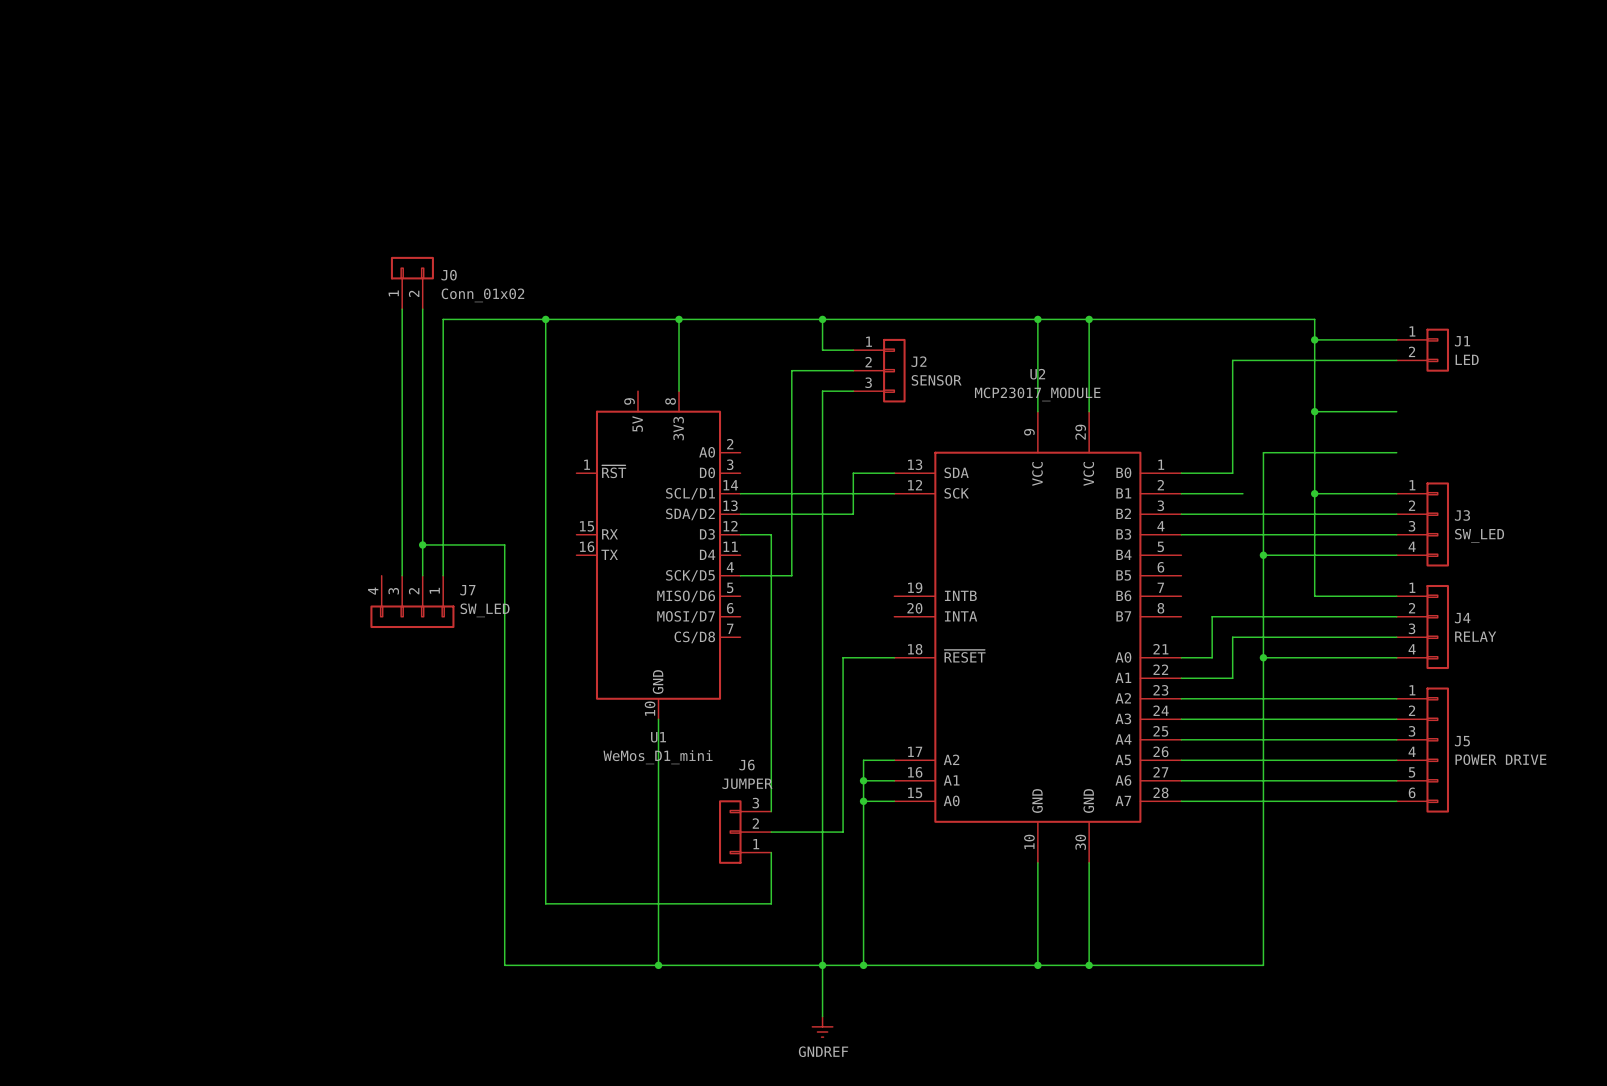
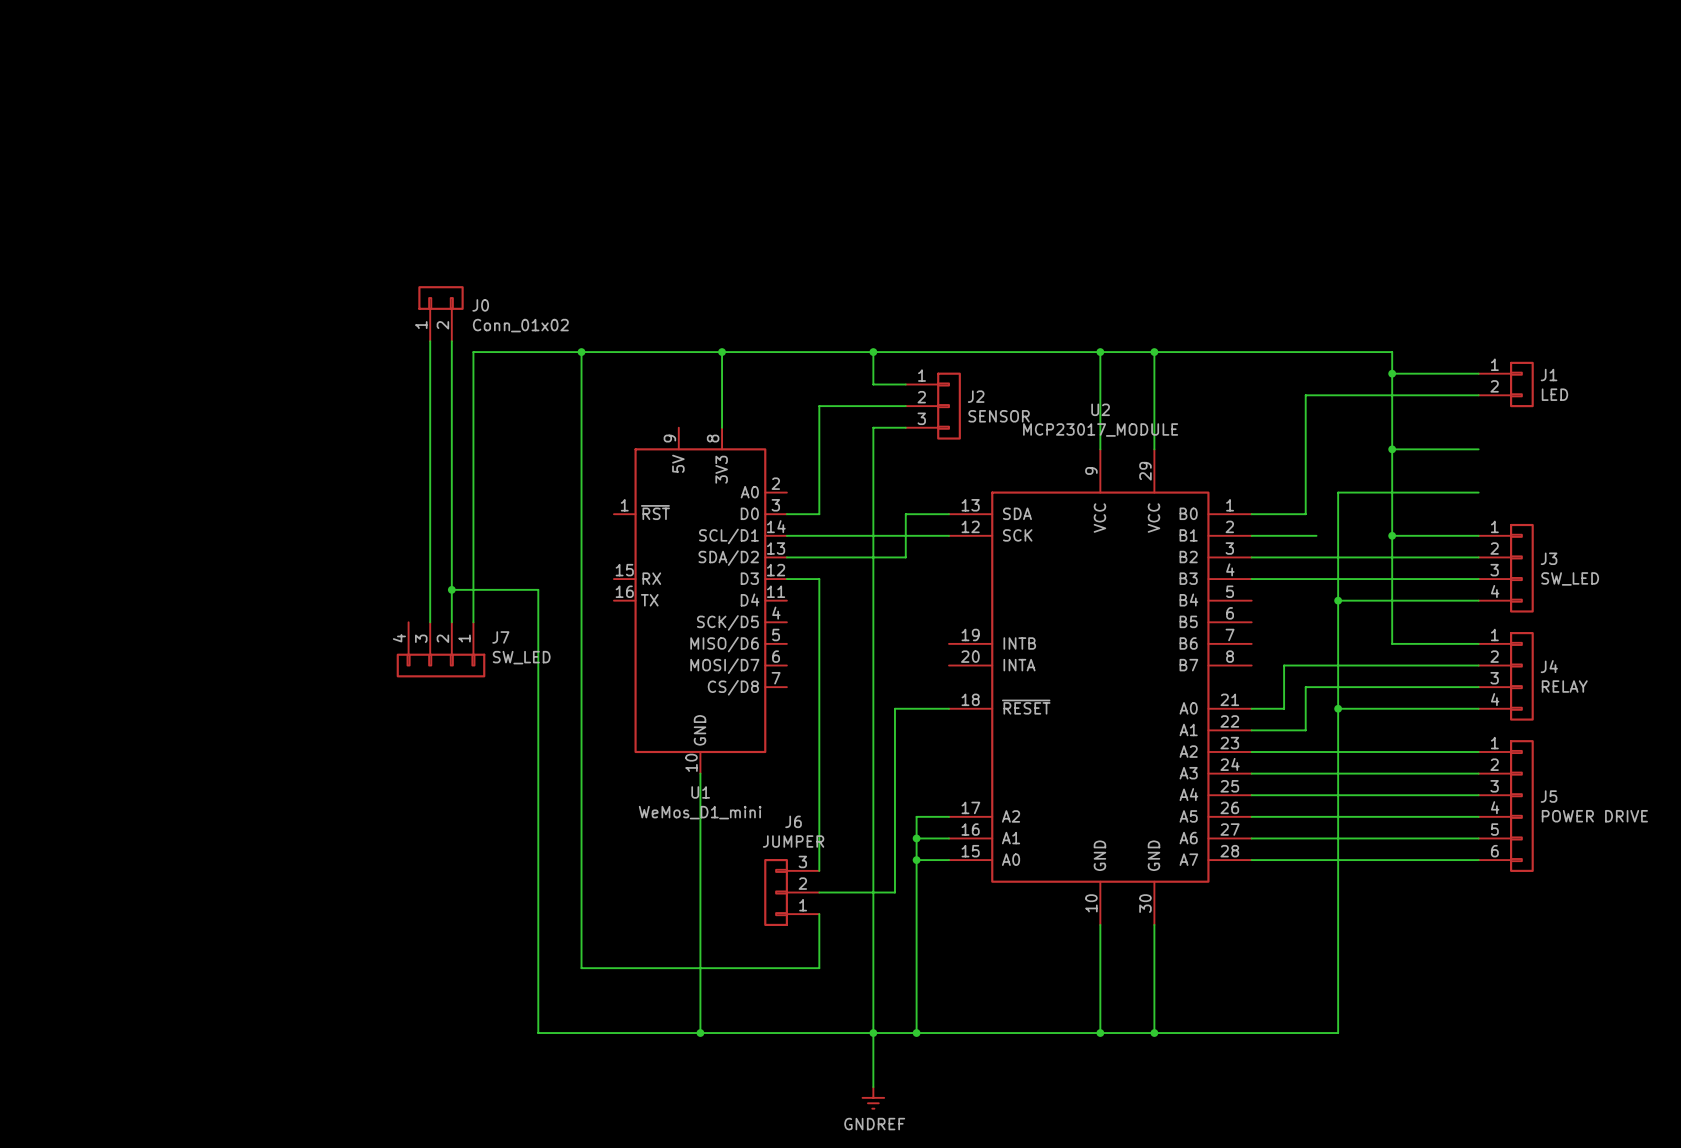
wire: (791, 370) (791, 575) (740, 575) -> (840, 406) (819, 406) (819, 514) (786, 514)

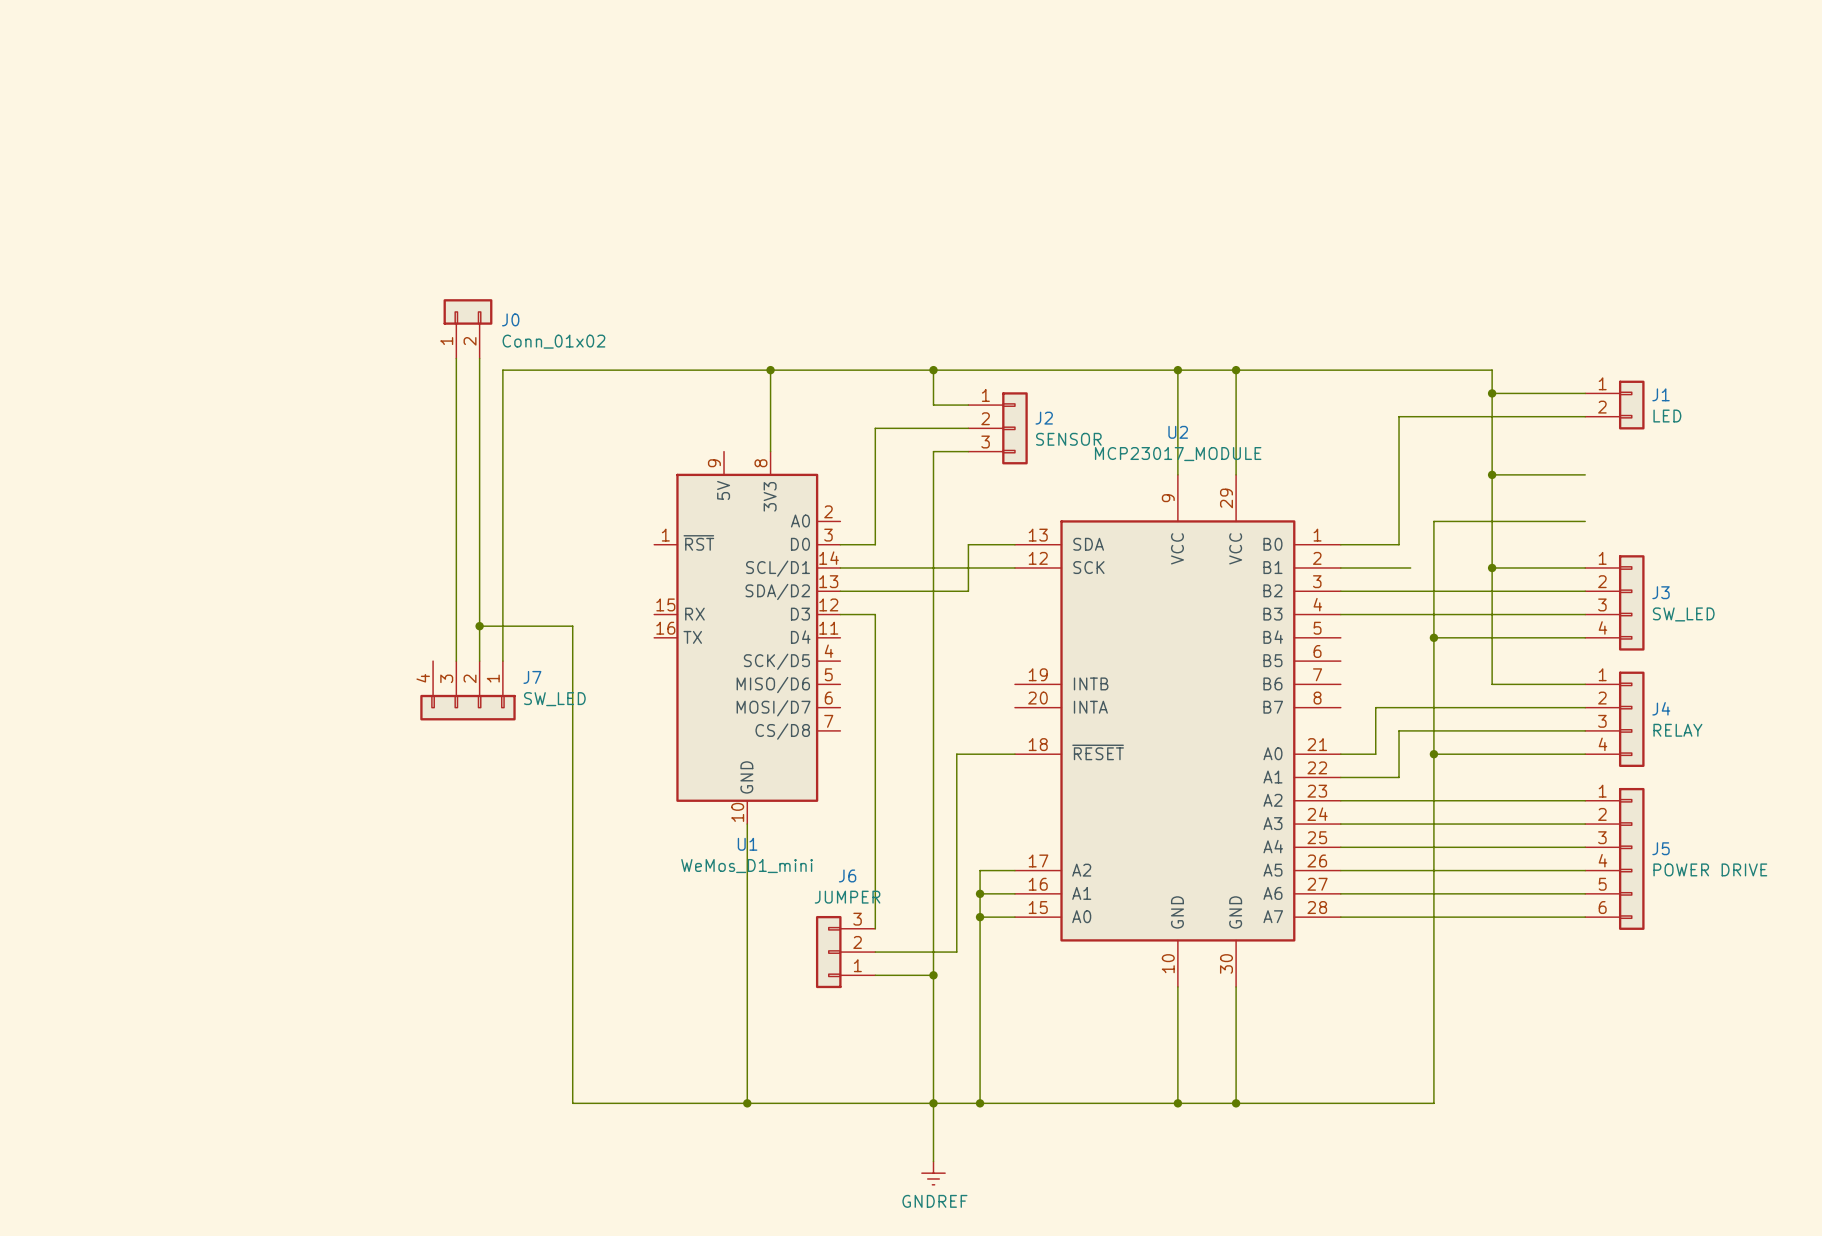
wire: (581, 352) (581, 968) (819, 968) (819, 914) -> (933, 975) (875, 975)
junction: (581, 352) -> none
junction: none -> (933, 975)

